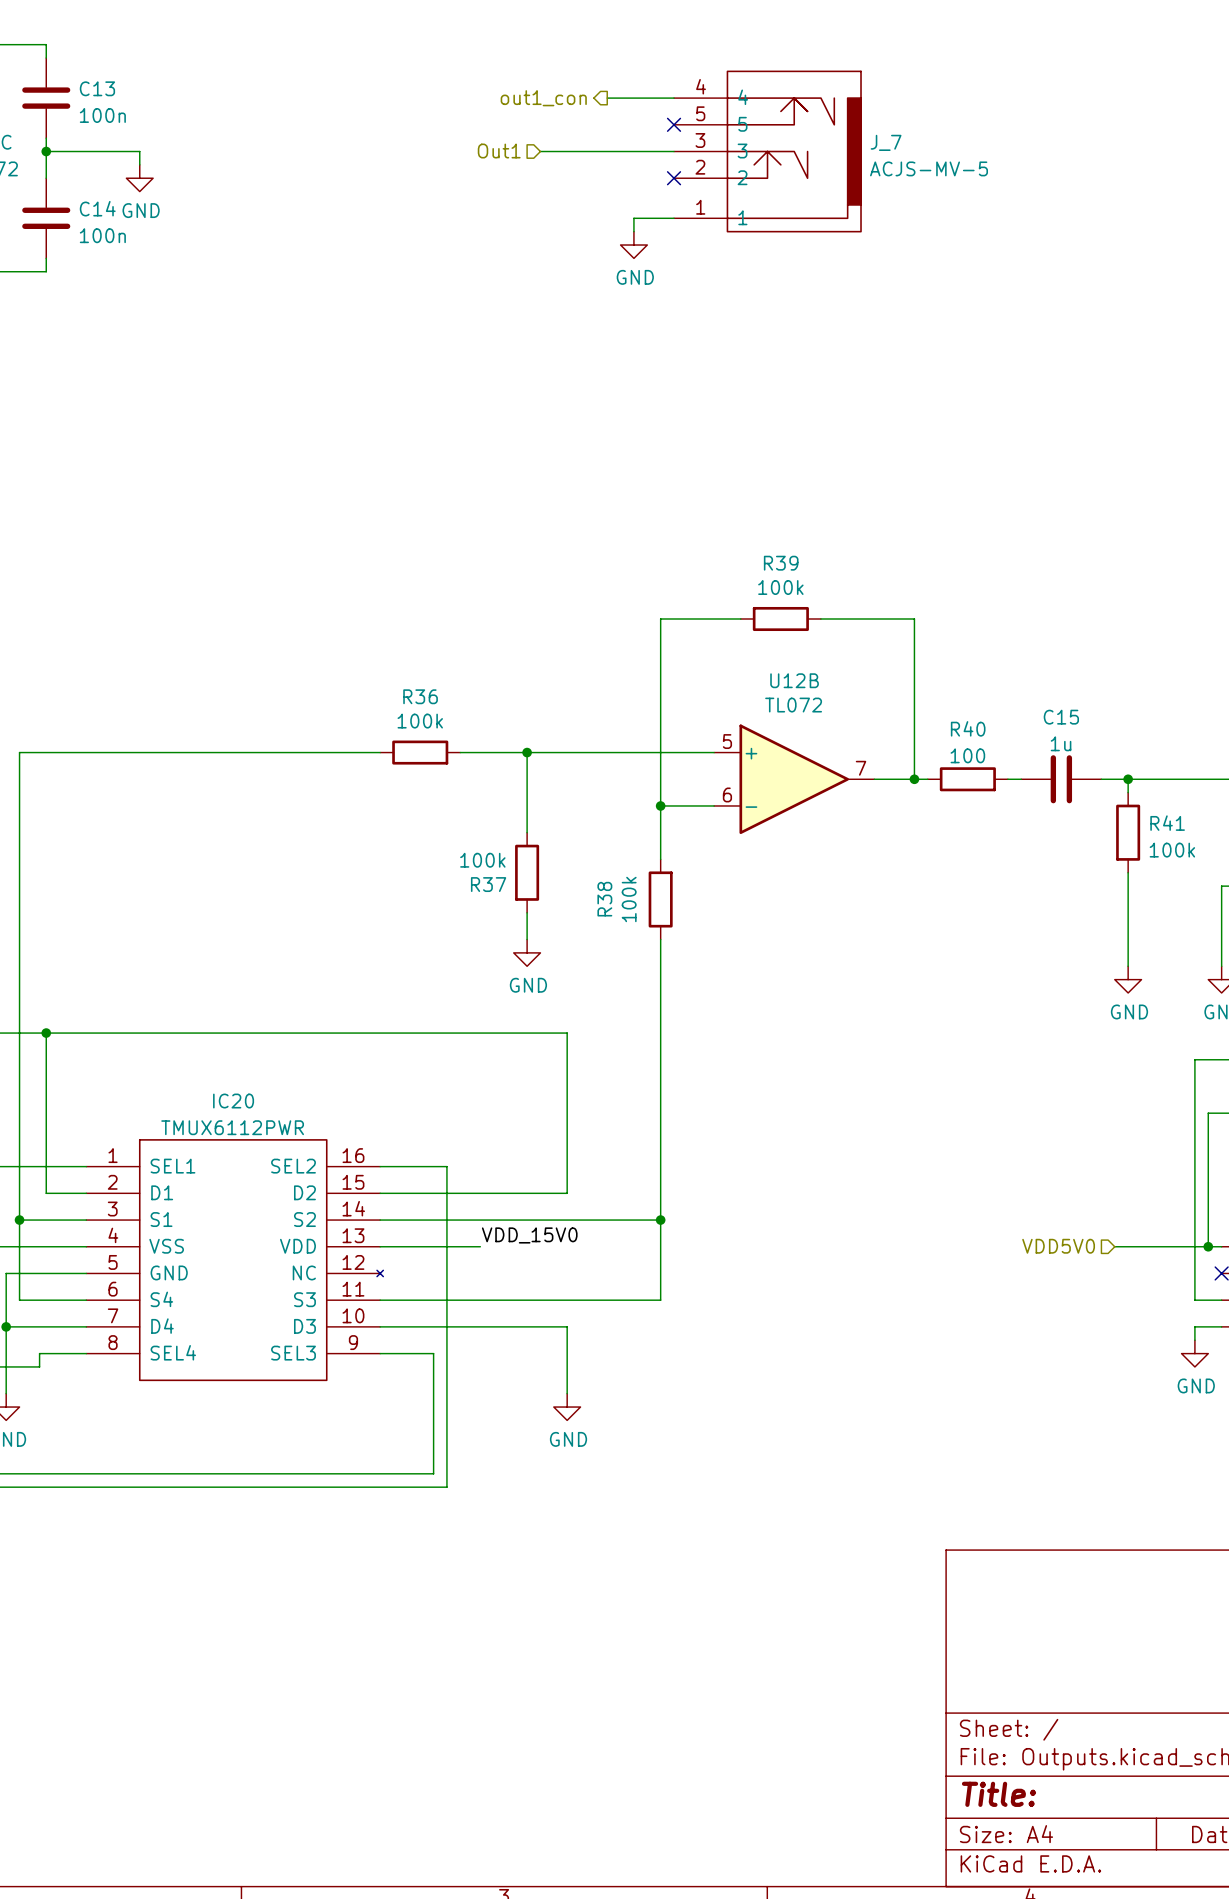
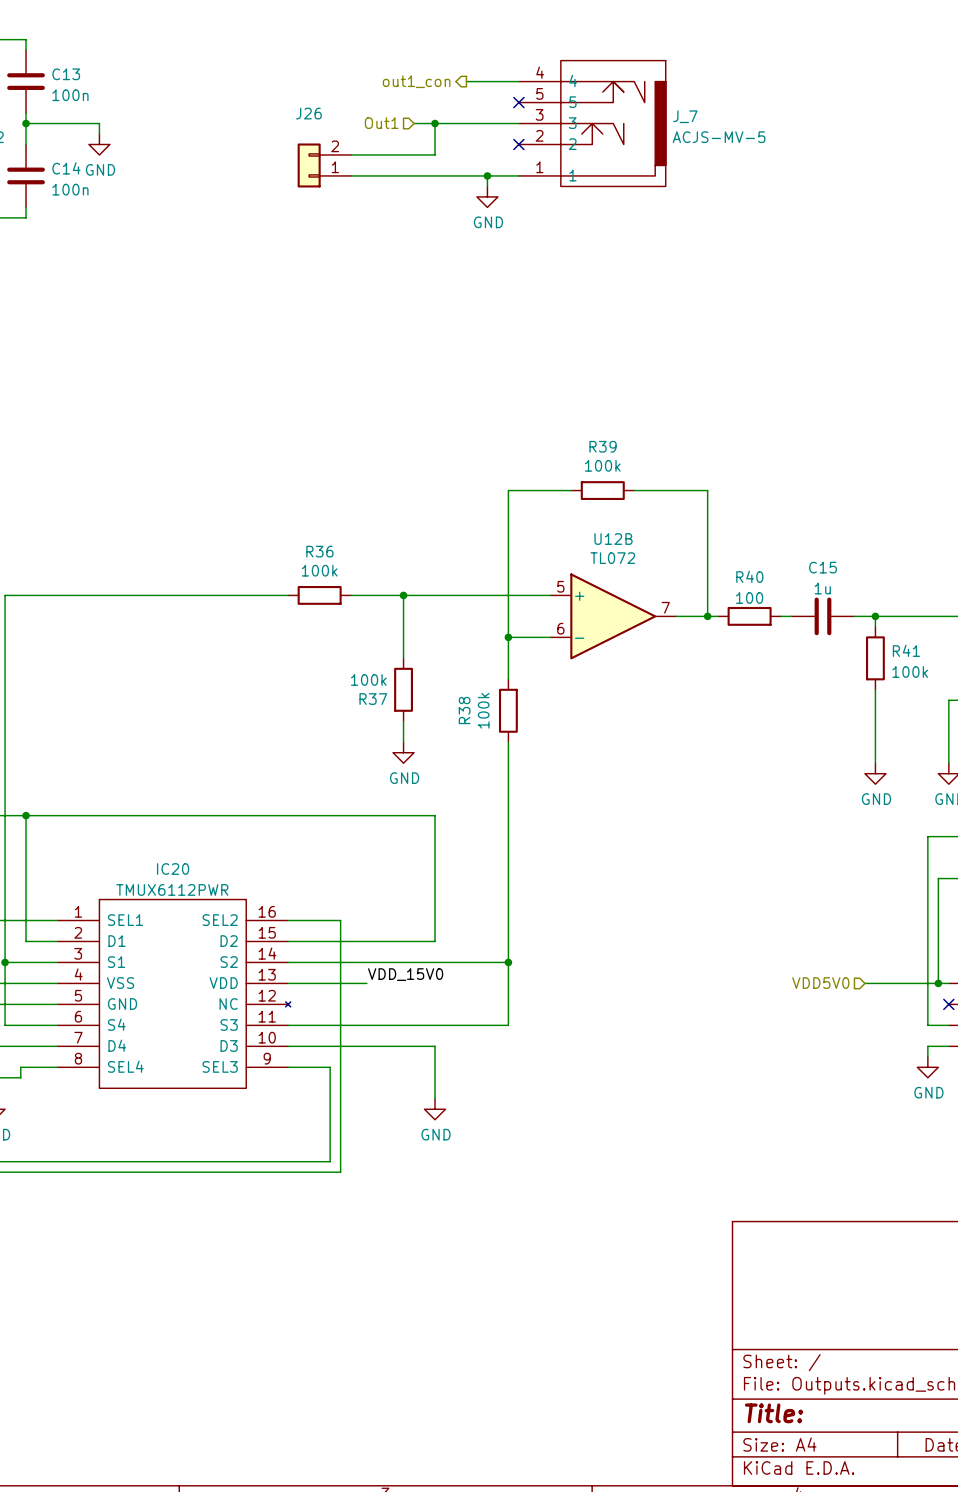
wire: none -> (435, 123) (435, 154) (351, 154)
junction: none -> (435, 123)
J26: none -> (324, 165)
wire: none -> (351, 175) (487, 175)
junction: none -> (487, 175)

